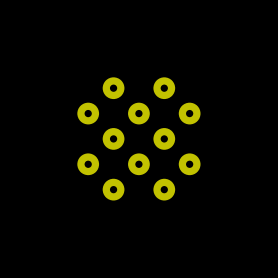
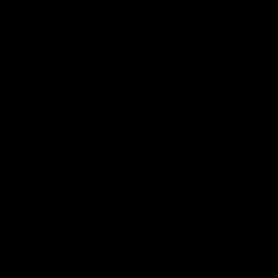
part: (138, 138) -> none

